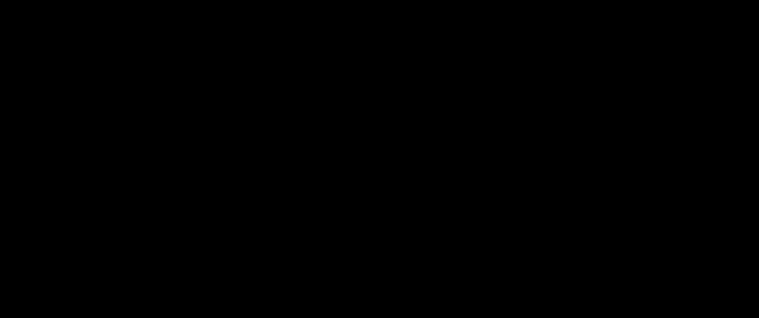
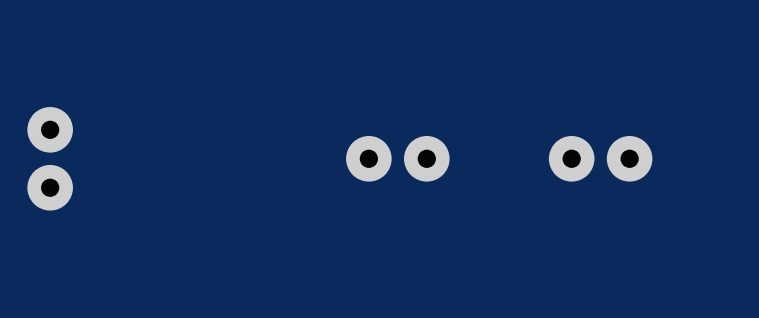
part: none -> (50, 158)
part: none -> (397, 158)
part: none -> (600, 158)

